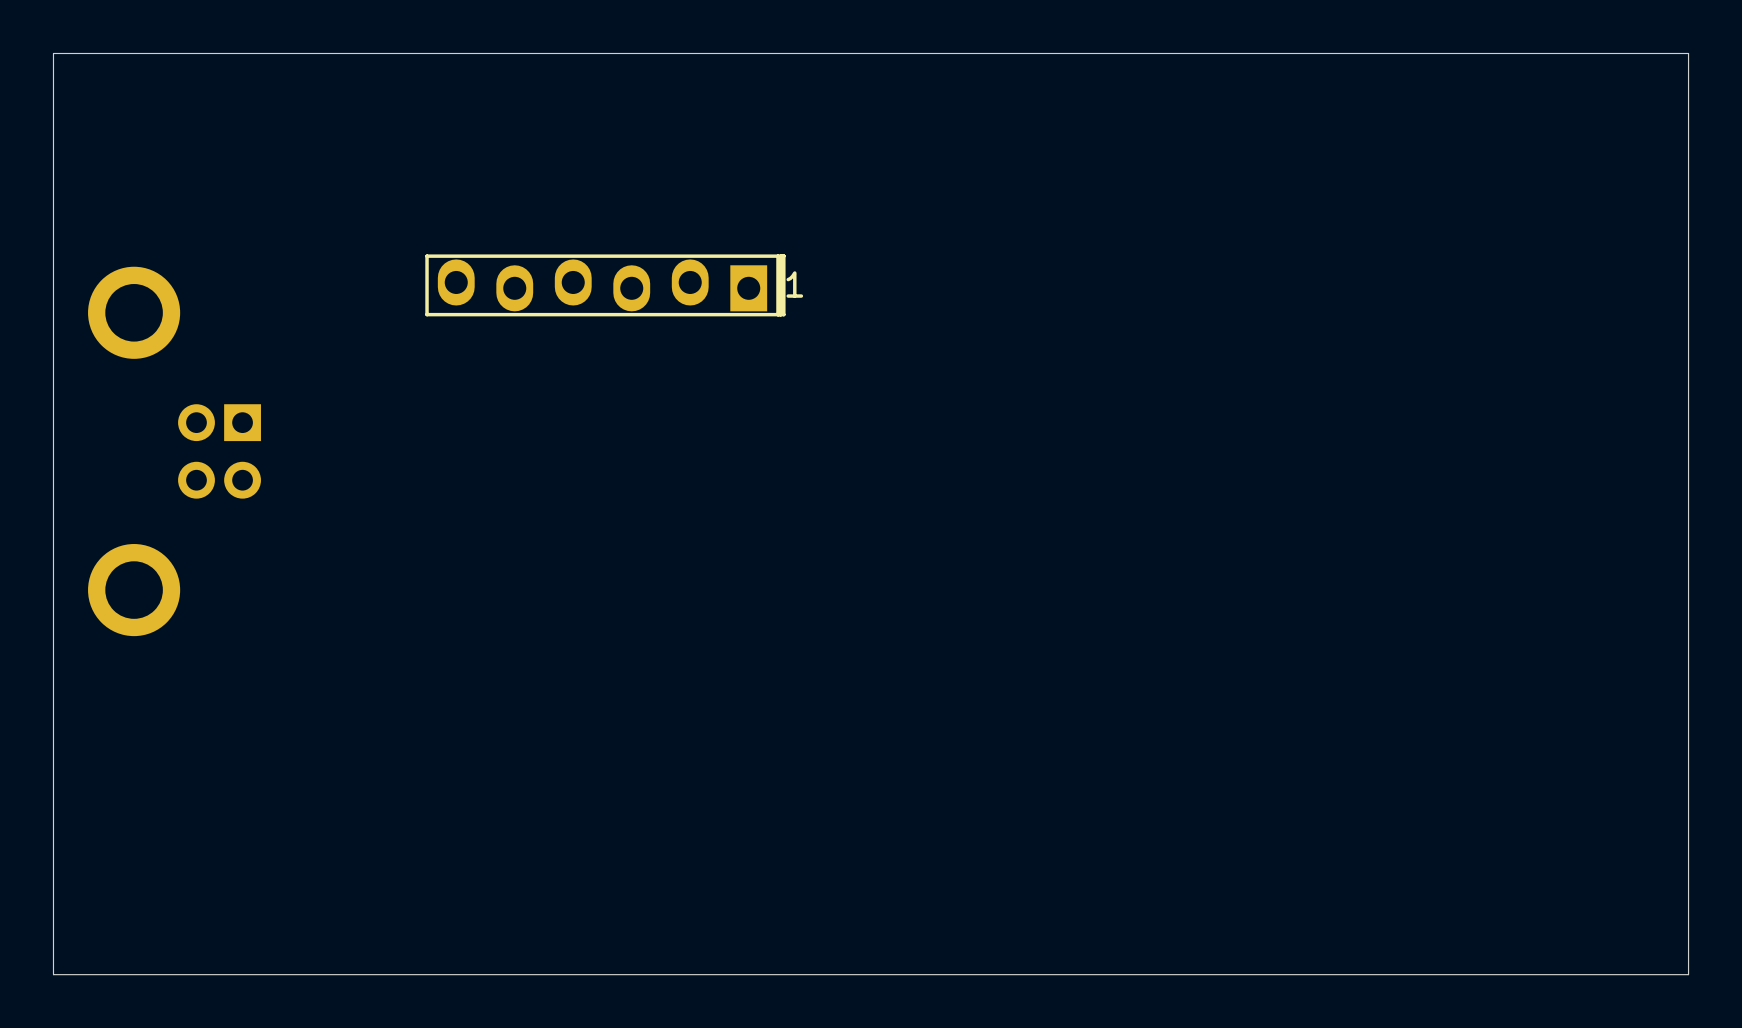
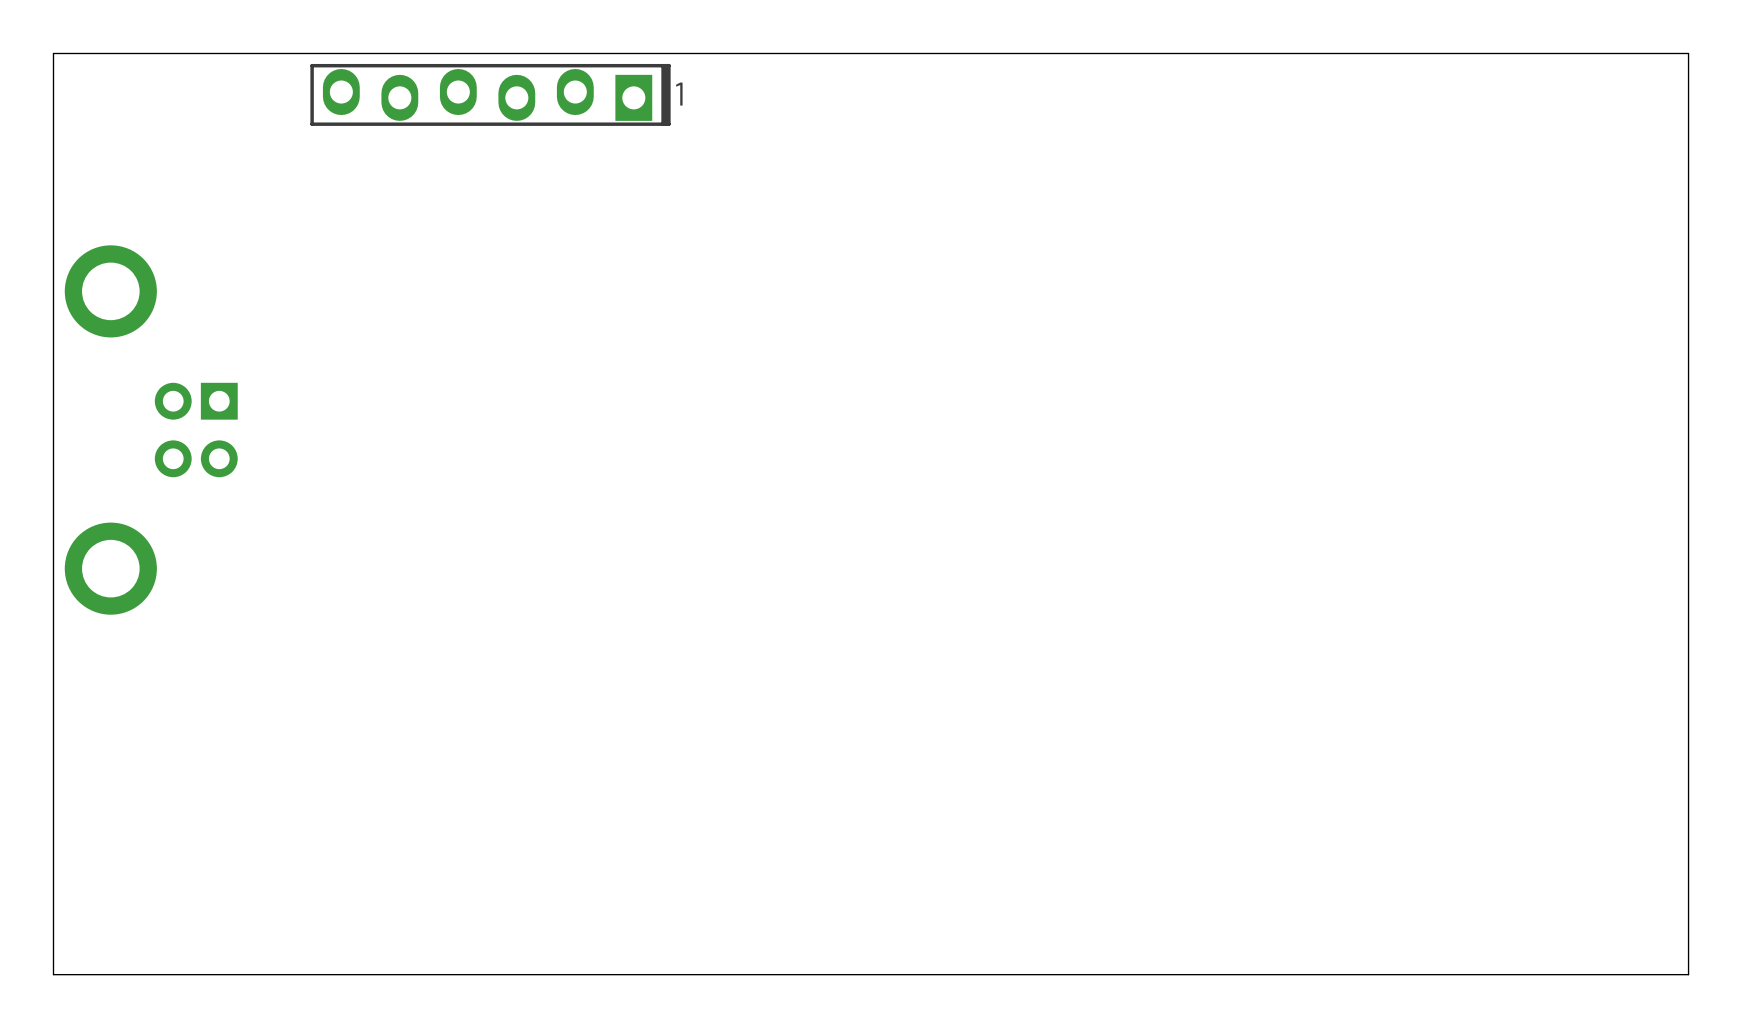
part position: (605, 285) -> (490, 94)
part position: (174, 451) -> (151, 430)

